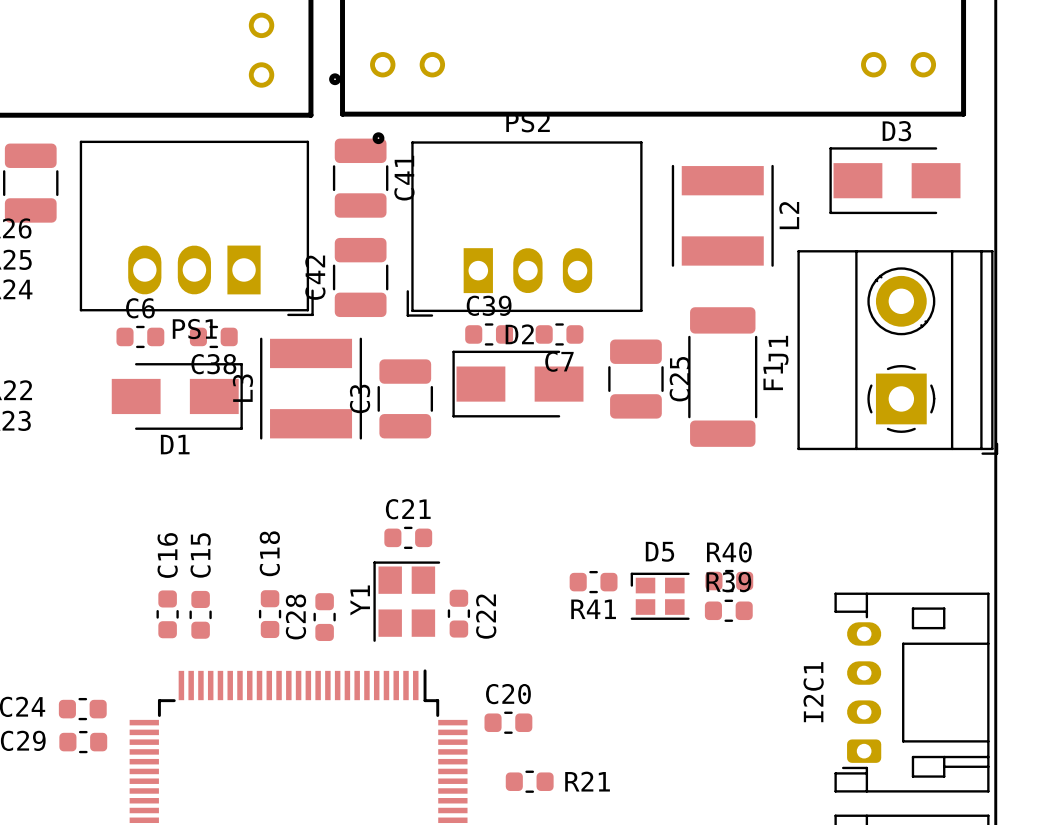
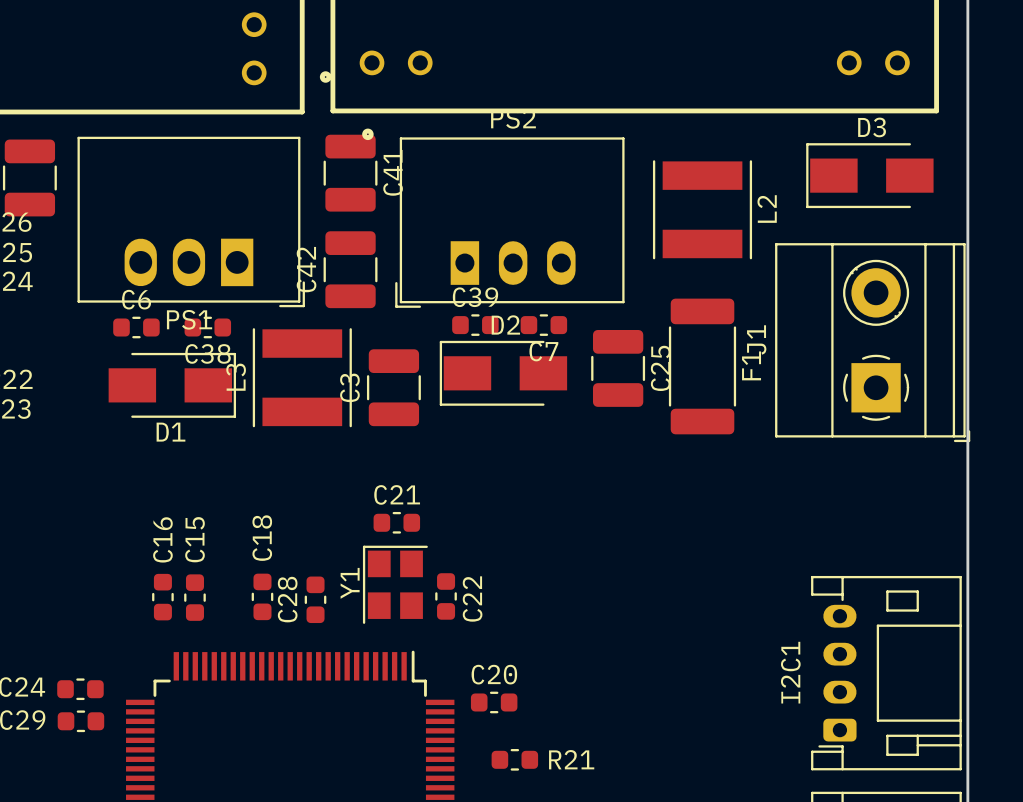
R40: (729, 581) -> none
R41: (593, 582) -> none
D5: (660, 596) -> none
R39: (728, 610) -> none

